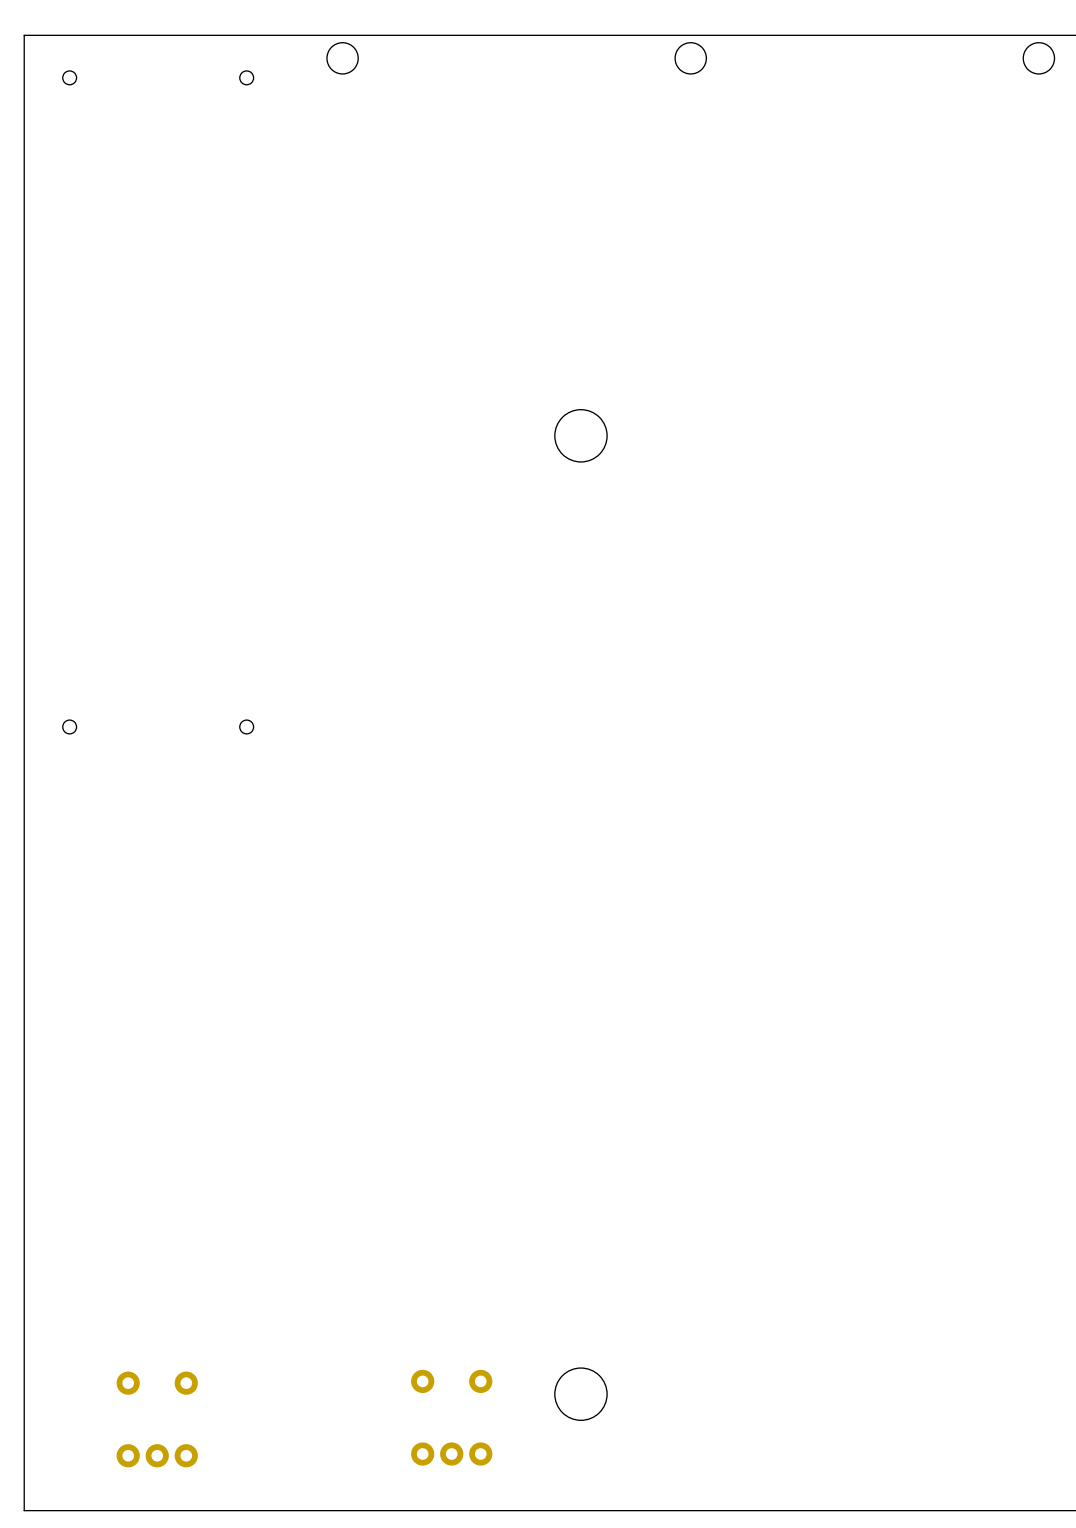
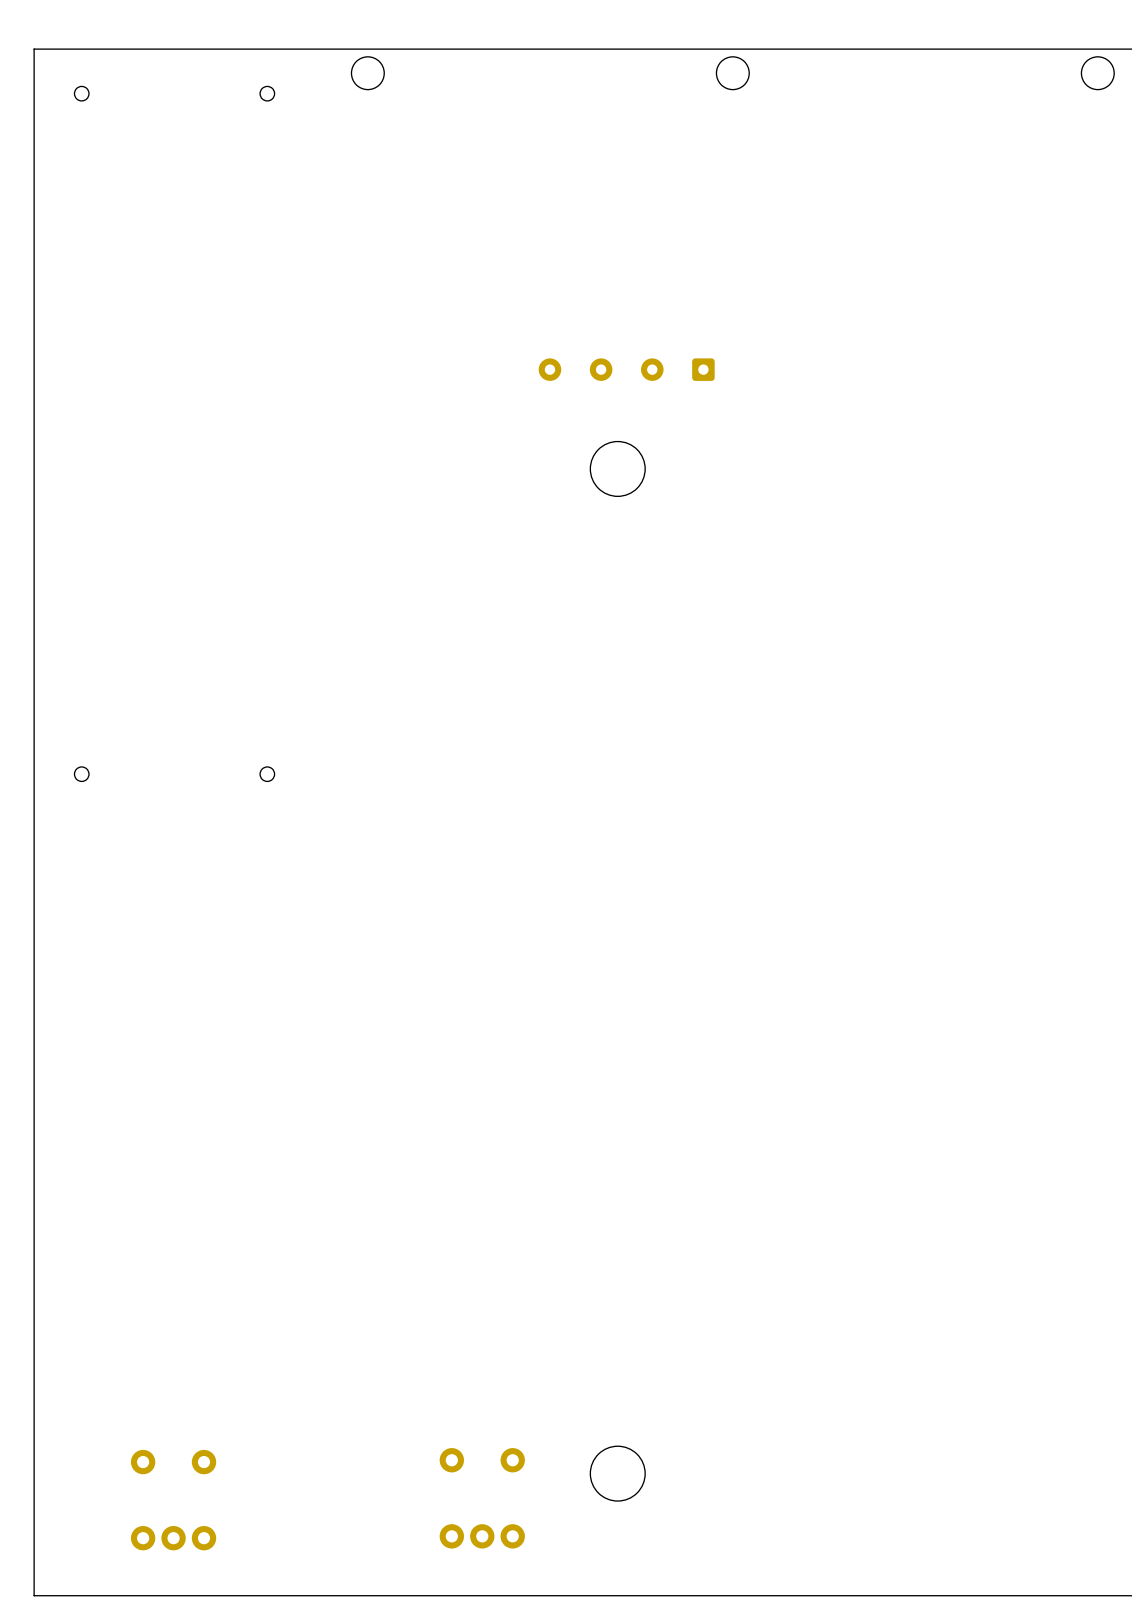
part: none -> (626, 369)

